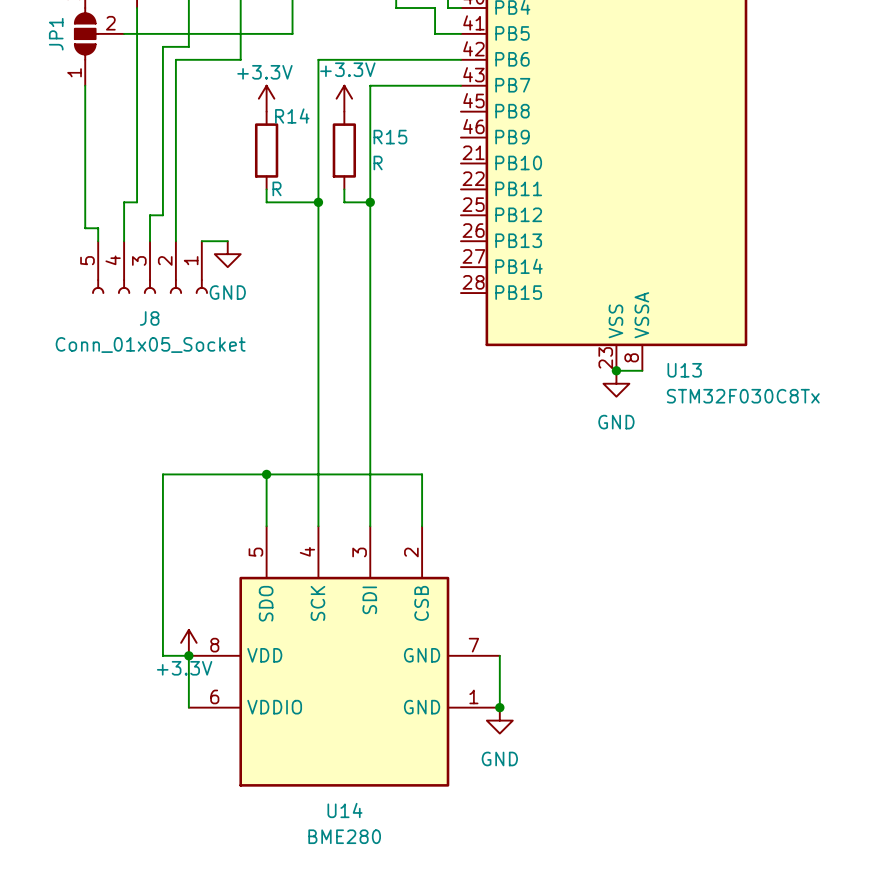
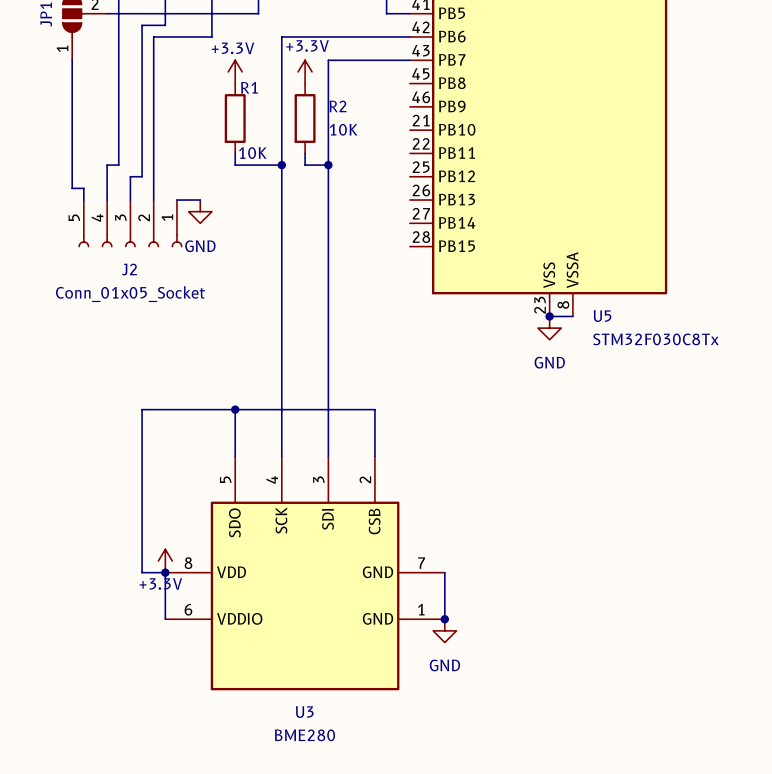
R14 name: R14 (292, 116) -> R1 (249, 87)
R15 name: R15 (390, 137) -> R2 (337, 106)
R15 value: R (378, 162) -> 10K (343, 129)
R14 value: R (277, 188) -> 10K (252, 153)
J8 name: J8 (149, 318) -> J2 (129, 269)
U13 name: U13 (684, 370) -> U5 (602, 316)
U14 name: U14 (344, 810) -> U3 (304, 712)

